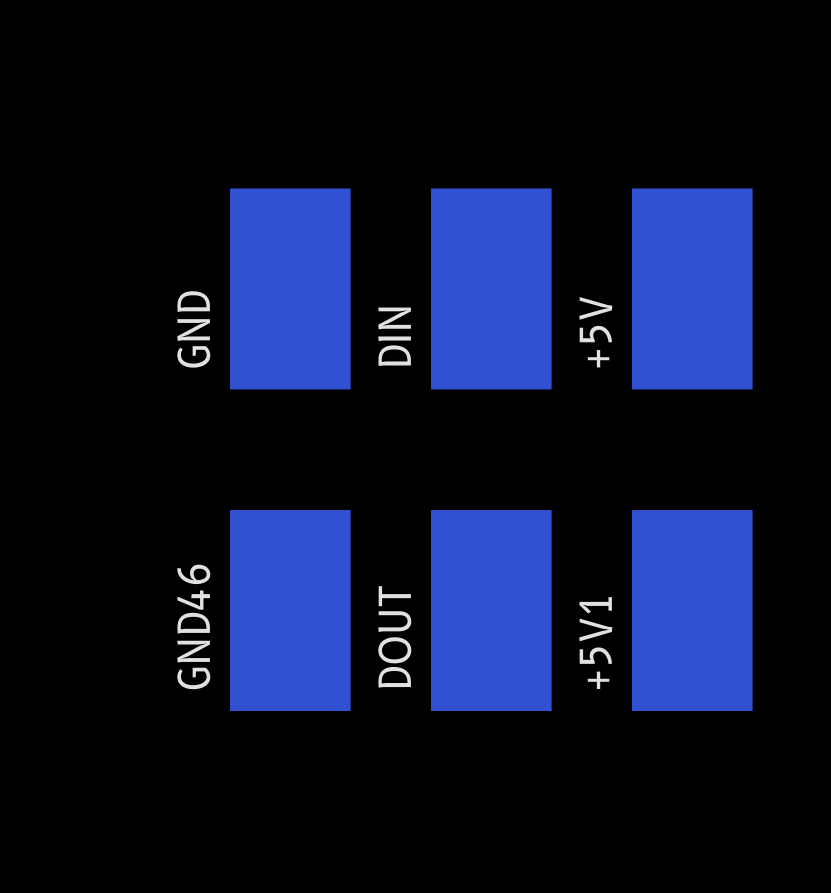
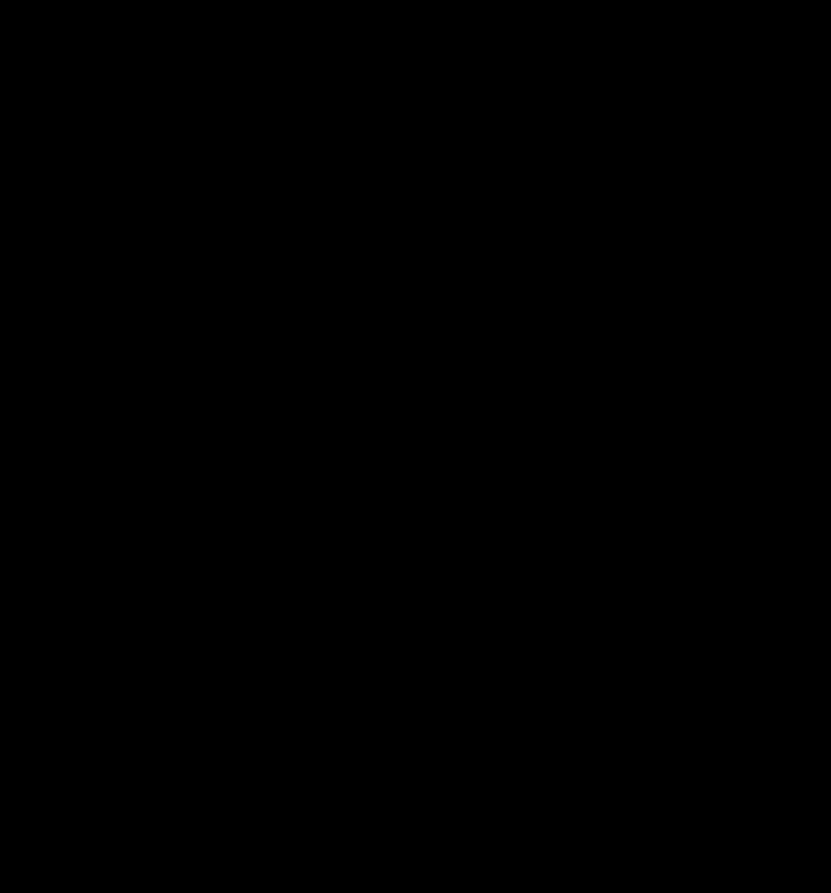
GND: (290, 288) -> none
DIN: (491, 288) -> none
+5V: (692, 288) -> none
GND46: (290, 610) -> none
DOUT: (491, 610) -> none
+5V1: (692, 610) -> none

